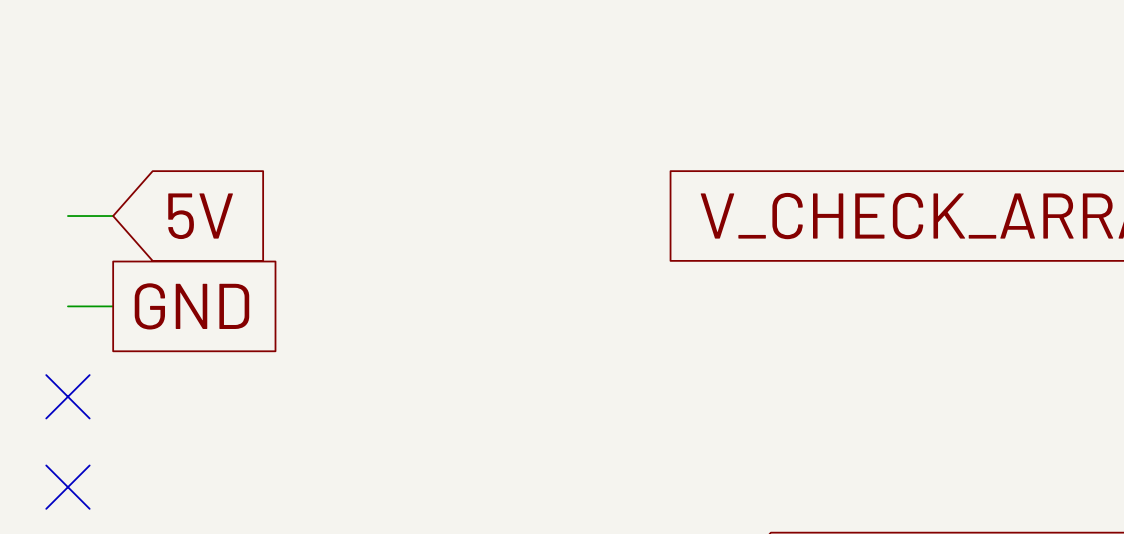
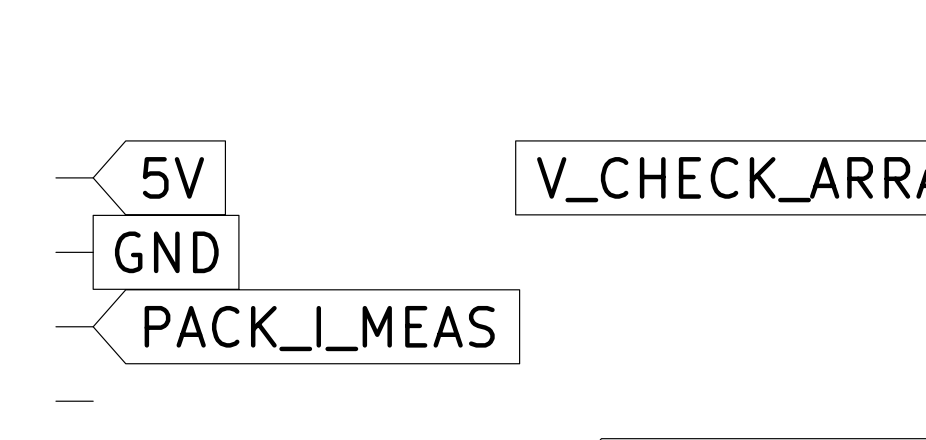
wire: none -> (55, 326) (93, 326)
no-connect mark: (67, 396) -> none
global label: none -> PACK_I_MEAS (319, 328)
wire: none -> (55, 401) (93, 401)
no-connect mark: (67, 487) -> none

